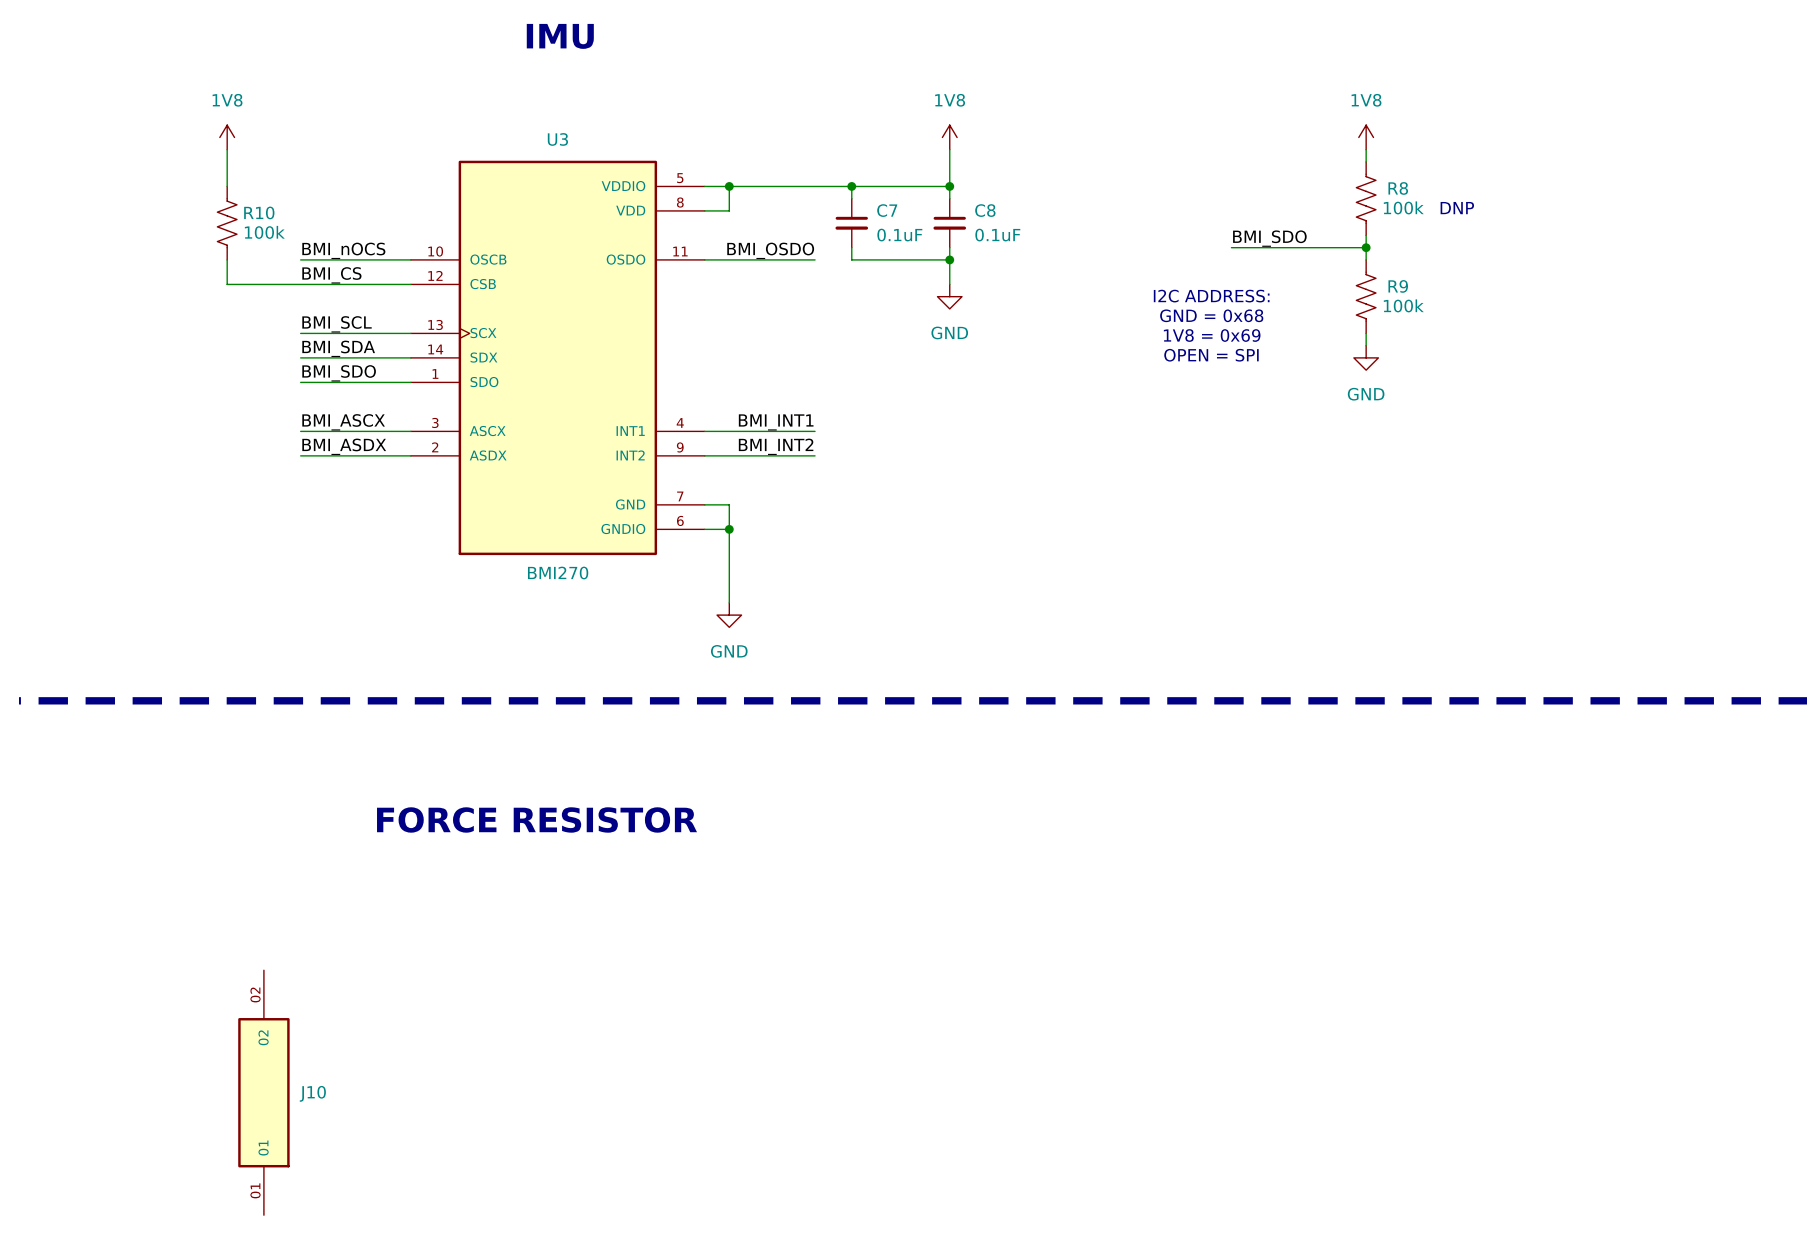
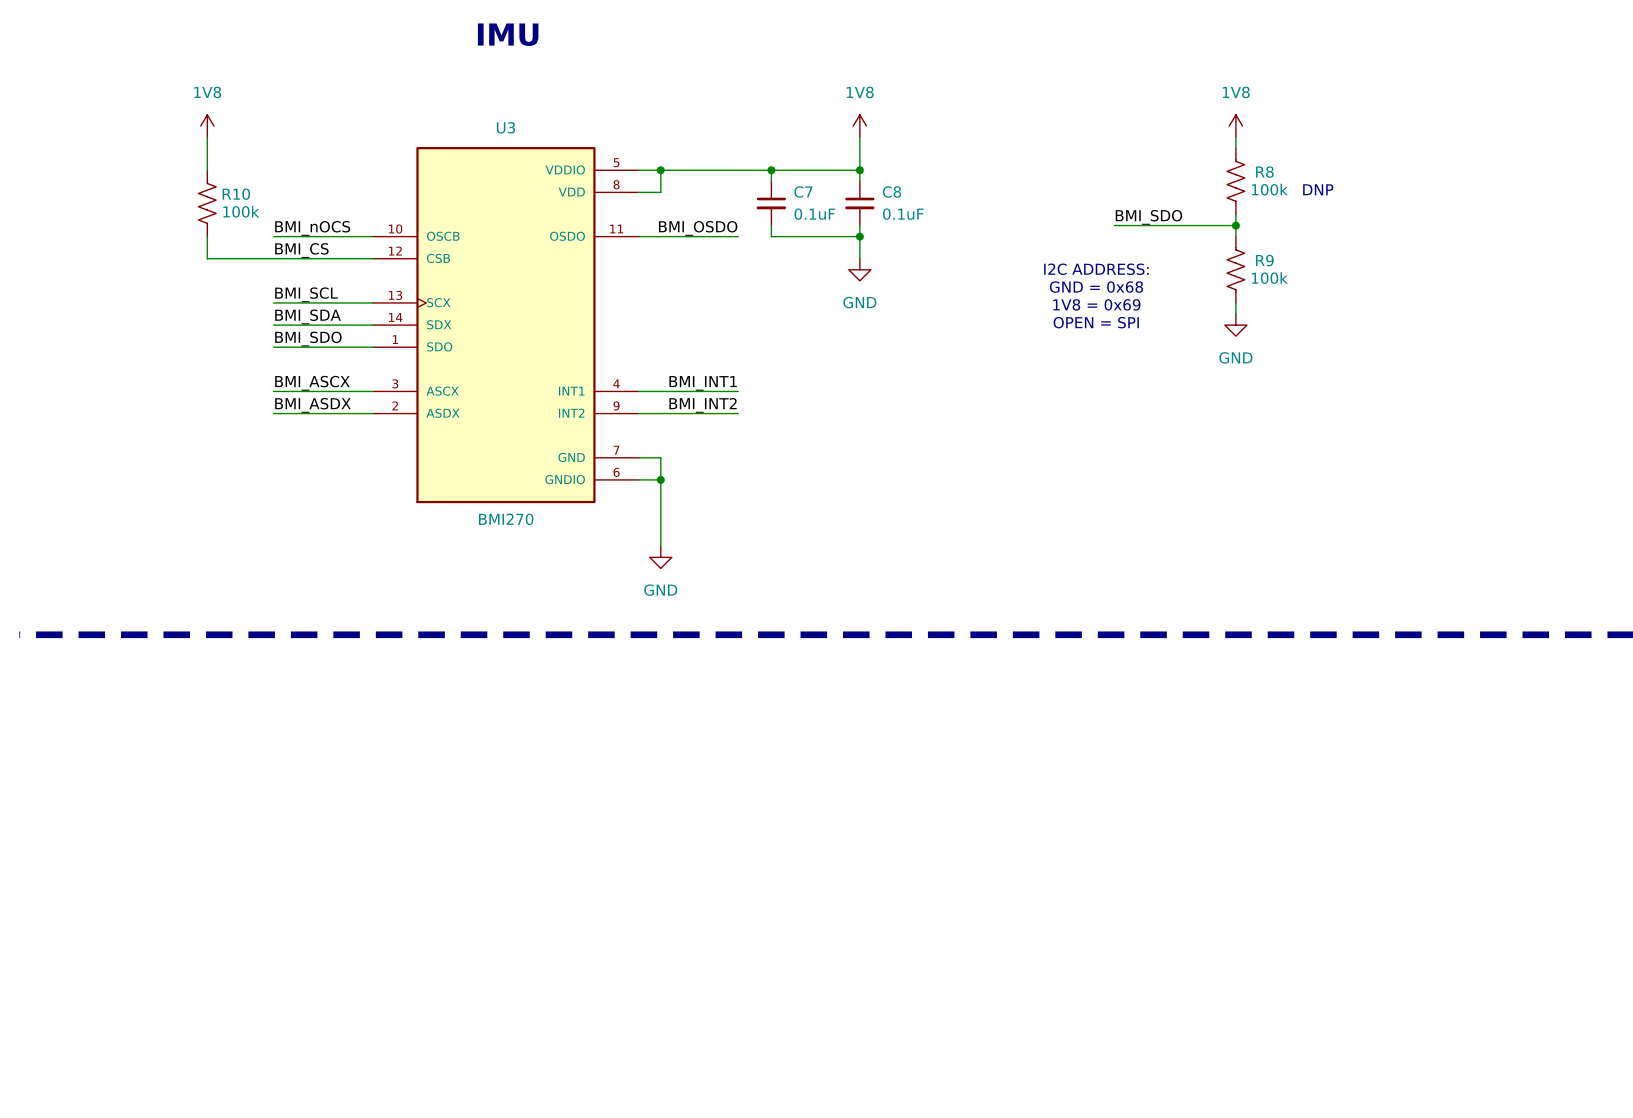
text: FORCE RESISTOR (537, 819) -> none
J10: (263, 1092) -> none

